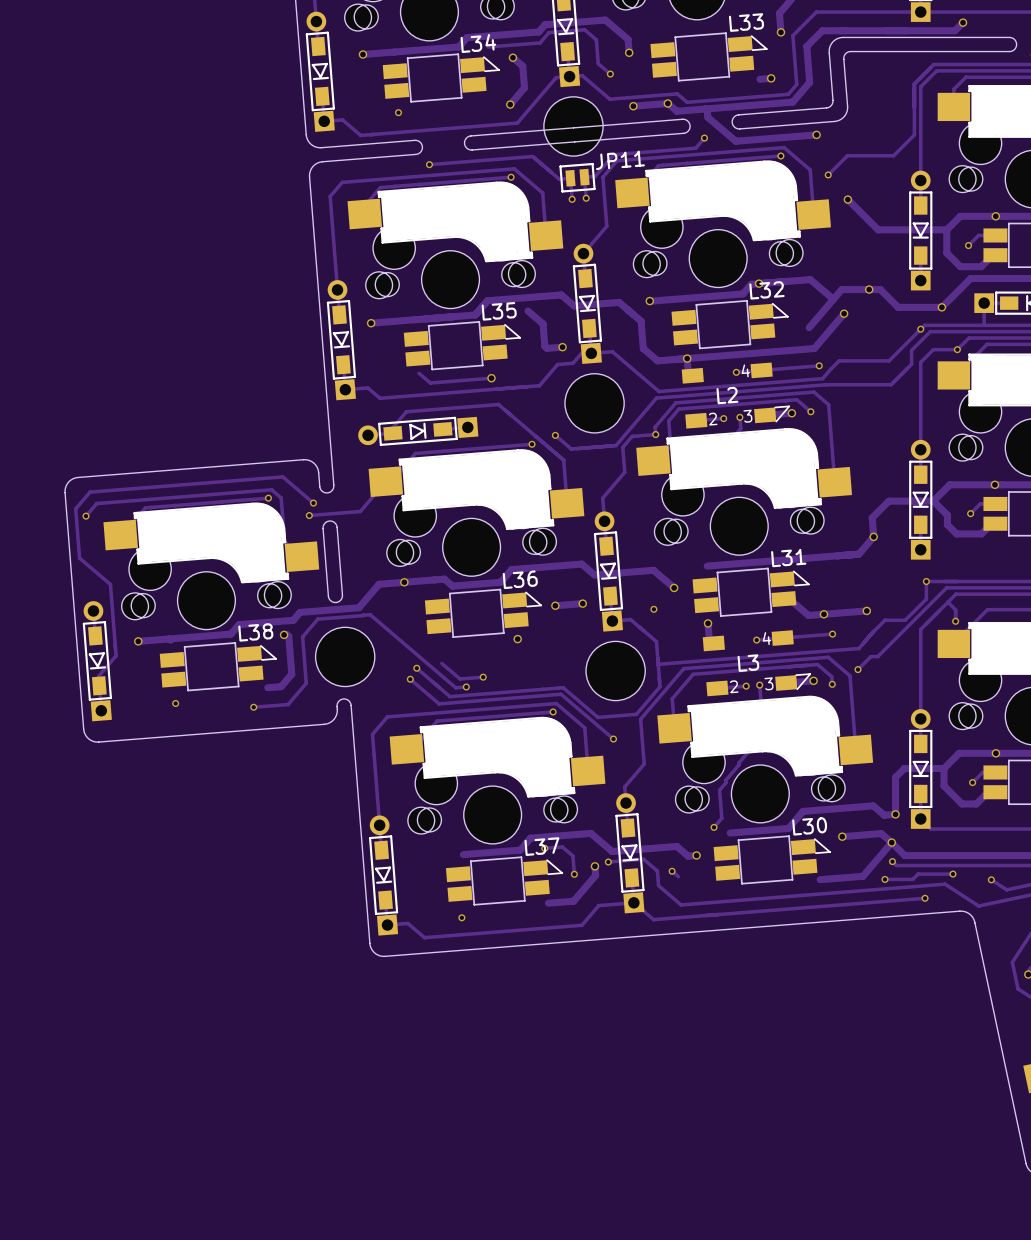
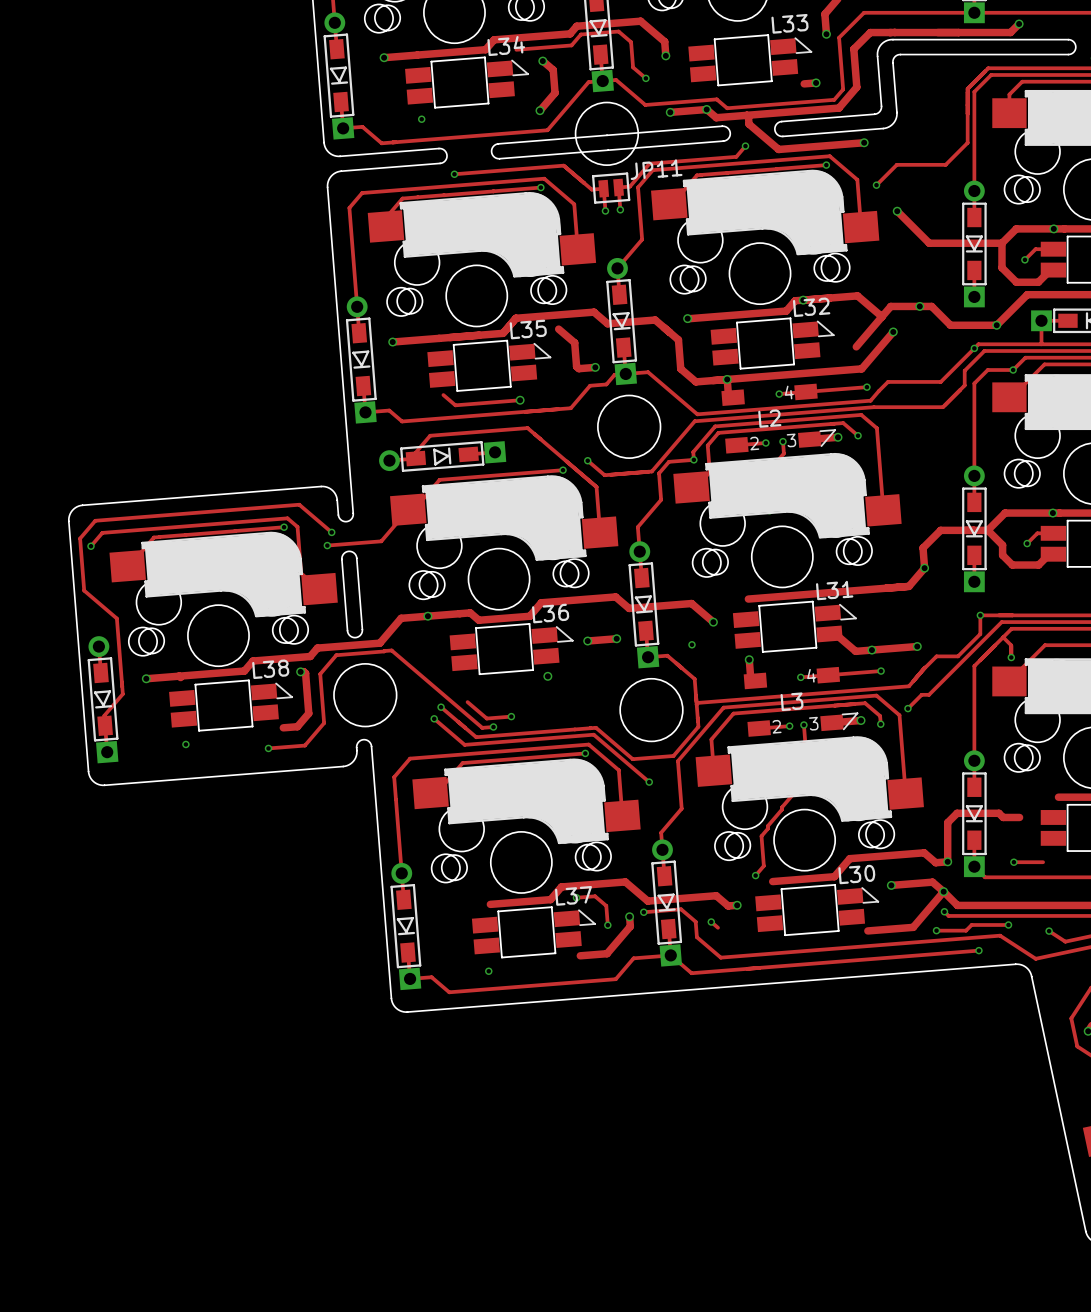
via: (995, 753) -> none
track: (1000, 753) (959, 753) (944, 768) (944, 785) (962, 803) (976, 803) (988, 792) (995, 792) -> none
track: none -> (998, 813) (1003, 817) (1019, 817)
track: (995, 772) (982, 772) (972, 782) -> none
via position: (972, 782) -> (1013, 862)
track: none -> (1013, 862) (1043, 862)

